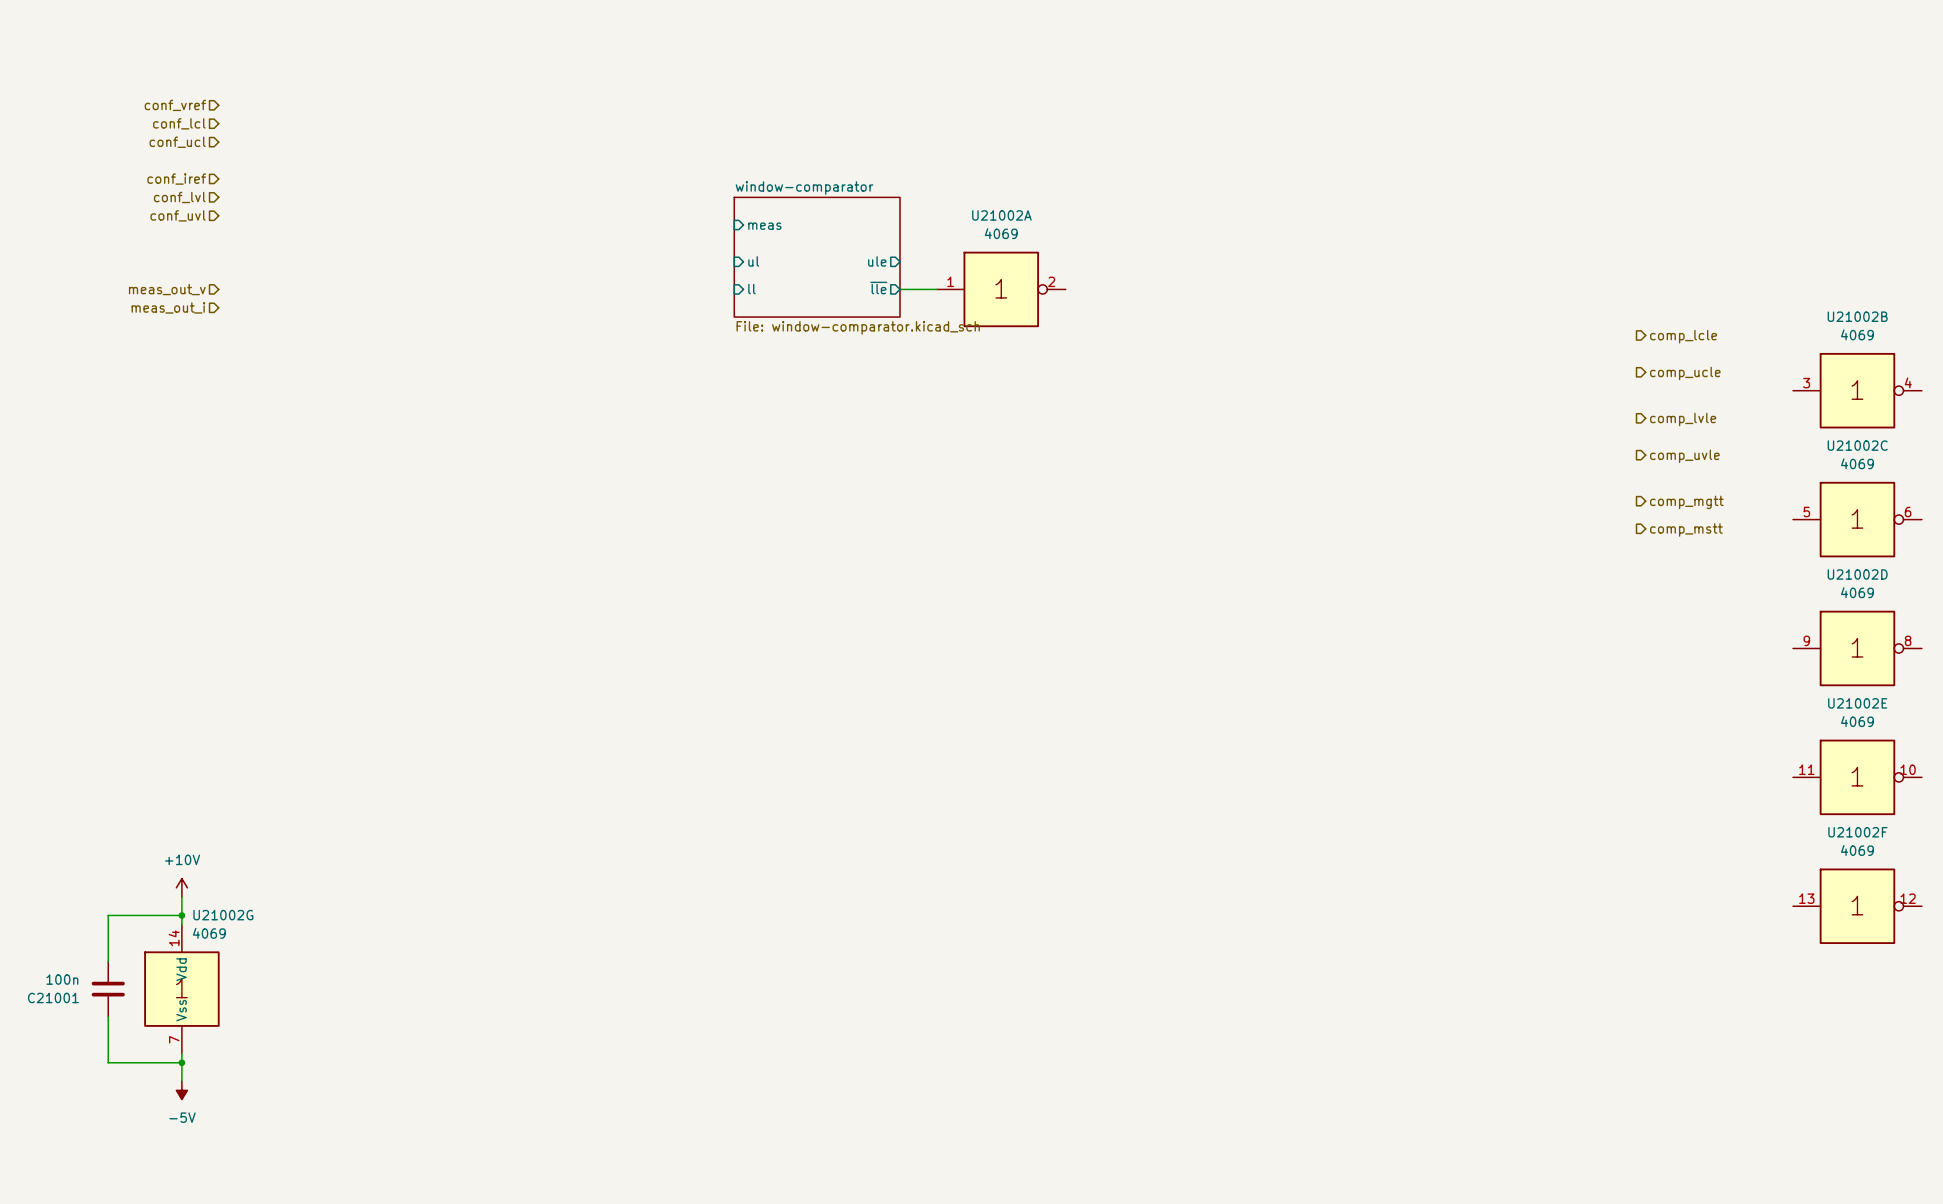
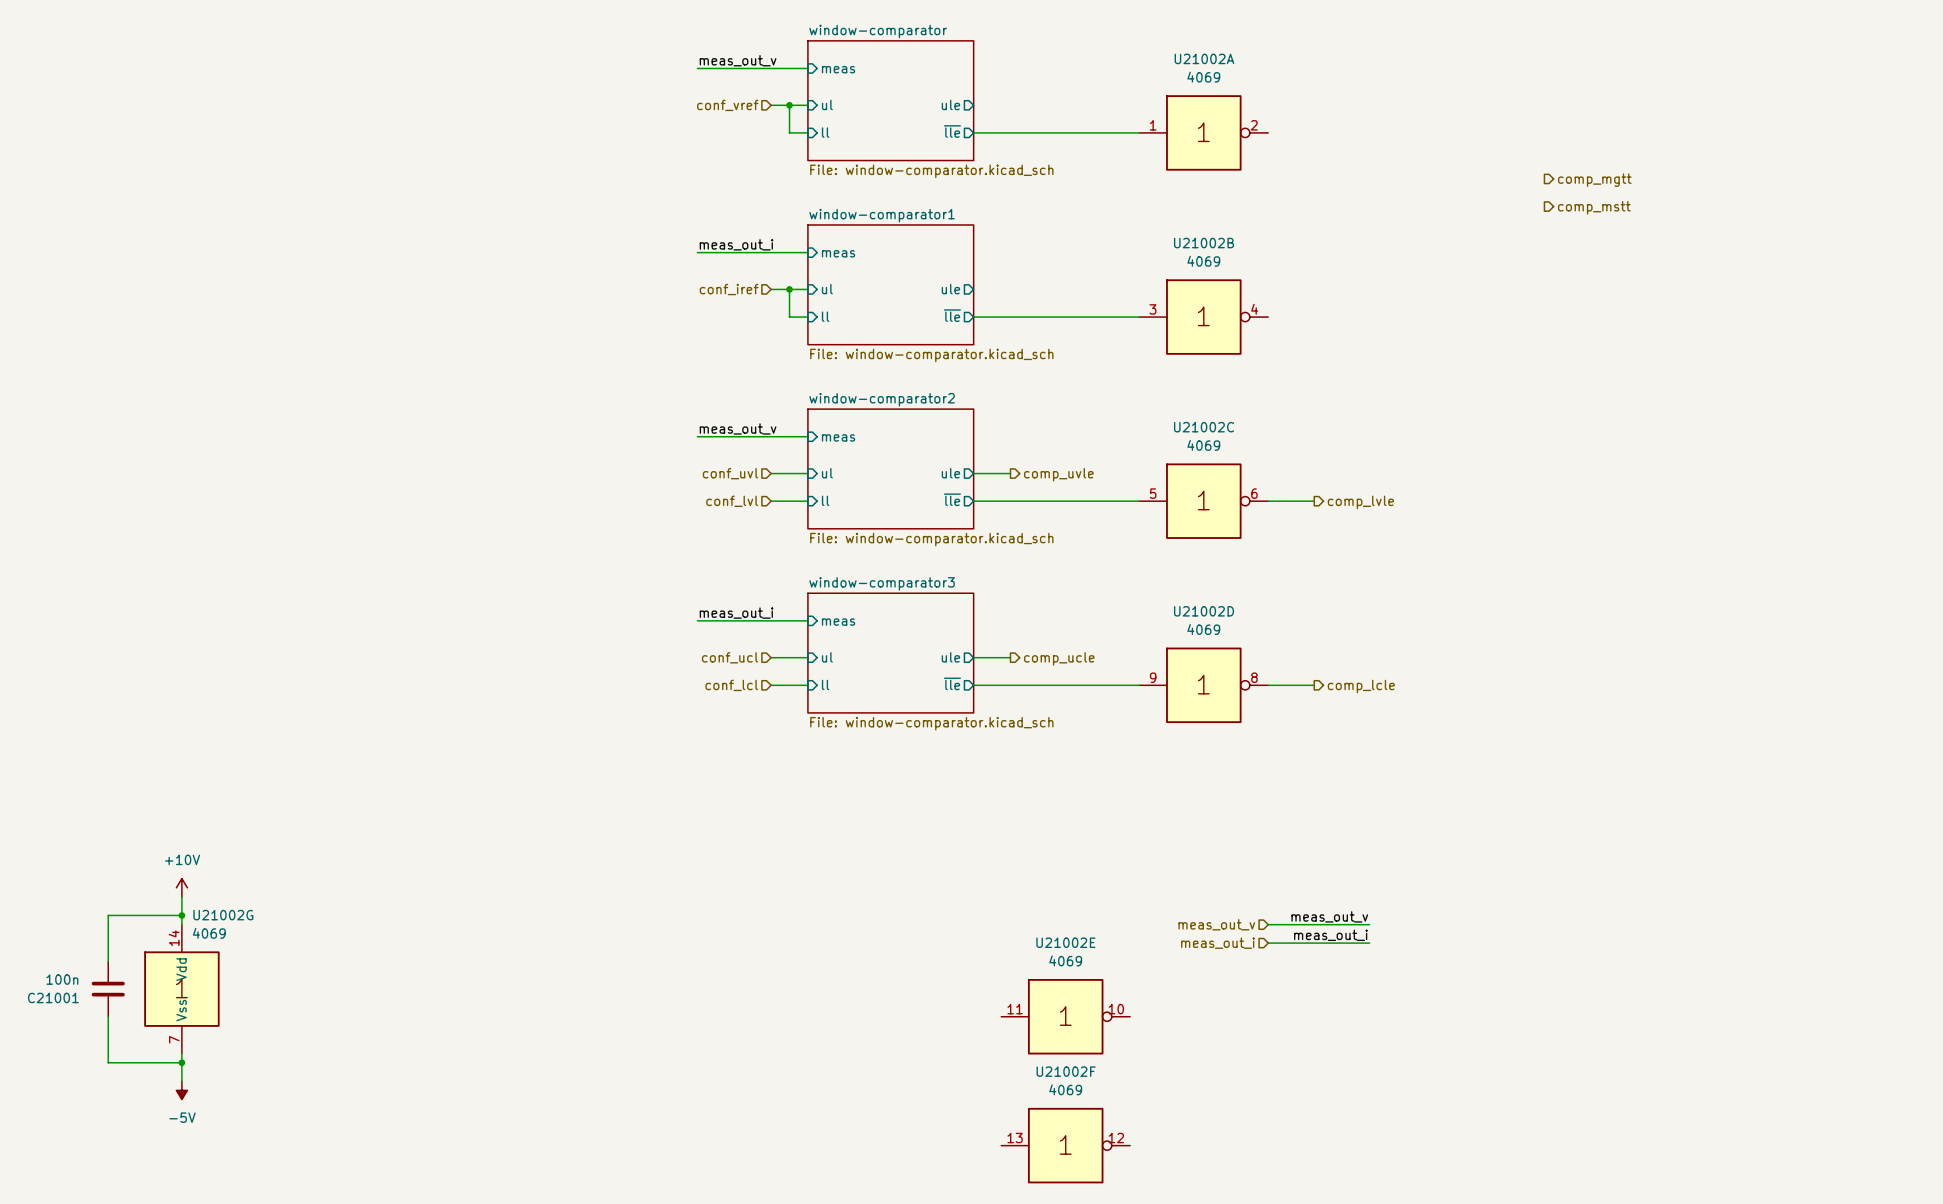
label: none -> meas_out_v (738, 60)
wire: none -> (697, 68) (807, 68)
sheet pin: none -> meas (838, 69)
sheet pin: none -> ul (827, 104)
sheet pin: none -> ule (950, 104)
hierarchical label: conf_vref (175, 105) -> none
hierarchical label: none -> conf_vref (727, 105)
wire: none -> (771, 105) (807, 105)
wire: none -> (789, 105) (789, 132) (807, 132)
junction: none -> (789, 105)
hierarchical label: conf_lcl (179, 123) -> none
sheet pin: none -> ~{lle} (952, 131)
sheet pin: none -> ll (825, 132)
wire: none -> (973, 132) (1139, 132)
hierarchical label: conf_ucl (177, 142) -> none
hierarchical label: conf_iref (176, 179) -> none
hierarchical label: none -> comp_mgtt (1594, 180)
hierarchical label: conf_lvl (179, 197) -> none
hierarchical label: none -> comp_mstt (1594, 207)
hierarchical label: conf_uvl (178, 215) -> none
sheet pin position: meas (764, 226) -> meas (838, 253)
label: none -> meas_out_i (736, 244)
wire: none -> (697, 252) (807, 252)
sheet window-comparator position: (817, 257) -> (890, 100)
sheet pin position: ul (753, 261) -> ul (827, 289)
sheet pin position: ule (877, 261) -> ule (950, 289)
sheet window-comparator1: none -> File: window-comparator.kicad_sch (890, 284)
sheet pin position: ~{lle} (878, 288) -> ~{lle} (952, 315)
hierarchical label: meas_out_v (167, 289) -> none
hierarchical label: none -> conf_iref (729, 289)
sheet pin position: ll (751, 289) -> ll (825, 316)
wire: none -> (789, 289) (789, 317) (807, 317)
junction: none -> (789, 289)
wire: (899, 289) (936, 289) -> (771, 289) (807, 289)
U21002A position: (1001, 289) -> (1203, 132)
hierarchical label: meas_out_i (168, 307) -> none
wire: none -> (973, 317) (1139, 317)
hierarchical label: comp_lcle (1683, 336) -> none
hierarchical label: comp_ucle (1685, 373) -> none
U21002B position: (1857, 390) -> (1203, 317)
hierarchical label: comp_lvle (1683, 419) -> none
label: none -> meas_out_v (738, 428)
wire: none -> (697, 436) (807, 436)
sheet pin: none -> meas (838, 437)
hierarchical label: comp_uvle (1684, 456) -> none
sheet window-comparator2: none -> File: window-comparator.kicad_sch (890, 468)
hierarchical label: none -> conf_uvl (730, 473)
wire: none -> (771, 473) (807, 473)
sheet pin: none -> ul (827, 473)
sheet pin: none -> ule (950, 473)
wire: none -> (973, 473) (1010, 473)
hierarchical label: none -> comp_uvle (1058, 474)
sheet pin: none -> ~{lle} (952, 499)
sheet pin: none -> ll (825, 500)
hierarchical label: none -> conf_lvl (732, 501)
wire: none -> (771, 501) (807, 501)
wire: none -> (973, 501) (1139, 501)
wire: none -> (1268, 501) (1314, 501)
hierarchical label: none -> comp_lvle (1360, 502)
hierarchical label: comp_mgtt (1686, 502) -> none
U21002C position: (1857, 519) -> (1203, 501)
hierarchical label: comp_mstt (1686, 529) -> none
label: none -> meas_out_i (736, 613)
wire: none -> (697, 620) (807, 620)
sheet pin: none -> meas (838, 622)
U21002D position: (1857, 648) -> (1203, 685)
sheet window-comparator3: none -> File: window-comparator.kicad_sch (890, 653)
hierarchical label: none -> conf_ucl (729, 657)
wire: none -> (771, 657) (807, 657)
sheet pin: none -> ul (827, 657)
sheet pin: none -> ule (950, 657)
wire: none -> (973, 657) (1010, 657)
hierarchical label: none -> comp_ucle (1059, 658)
sheet pin: none -> ~{lle} (952, 683)
sheet pin: none -> ll (825, 684)
hierarchical label: none -> conf_lcl (731, 685)
wire: none -> (771, 685) (807, 685)
wire: none -> (973, 685) (1139, 685)
wire: none -> (1268, 685) (1314, 685)
hierarchical label: none -> comp_lcle (1361, 686)
U21002E position: (1857, 777) -> (1065, 1016)
U21002F position: (1857, 906) -> (1065, 1145)
label: none -> meas_out_v (1329, 916)
hierarchical label: none -> meas_out_v (1216, 924)
wire: none -> (1268, 924) (1369, 924)
label: none -> meas_out_i (1330, 935)
hierarchical label: none -> meas_out_i (1217, 943)
wire: none -> (1268, 943) (1369, 943)

